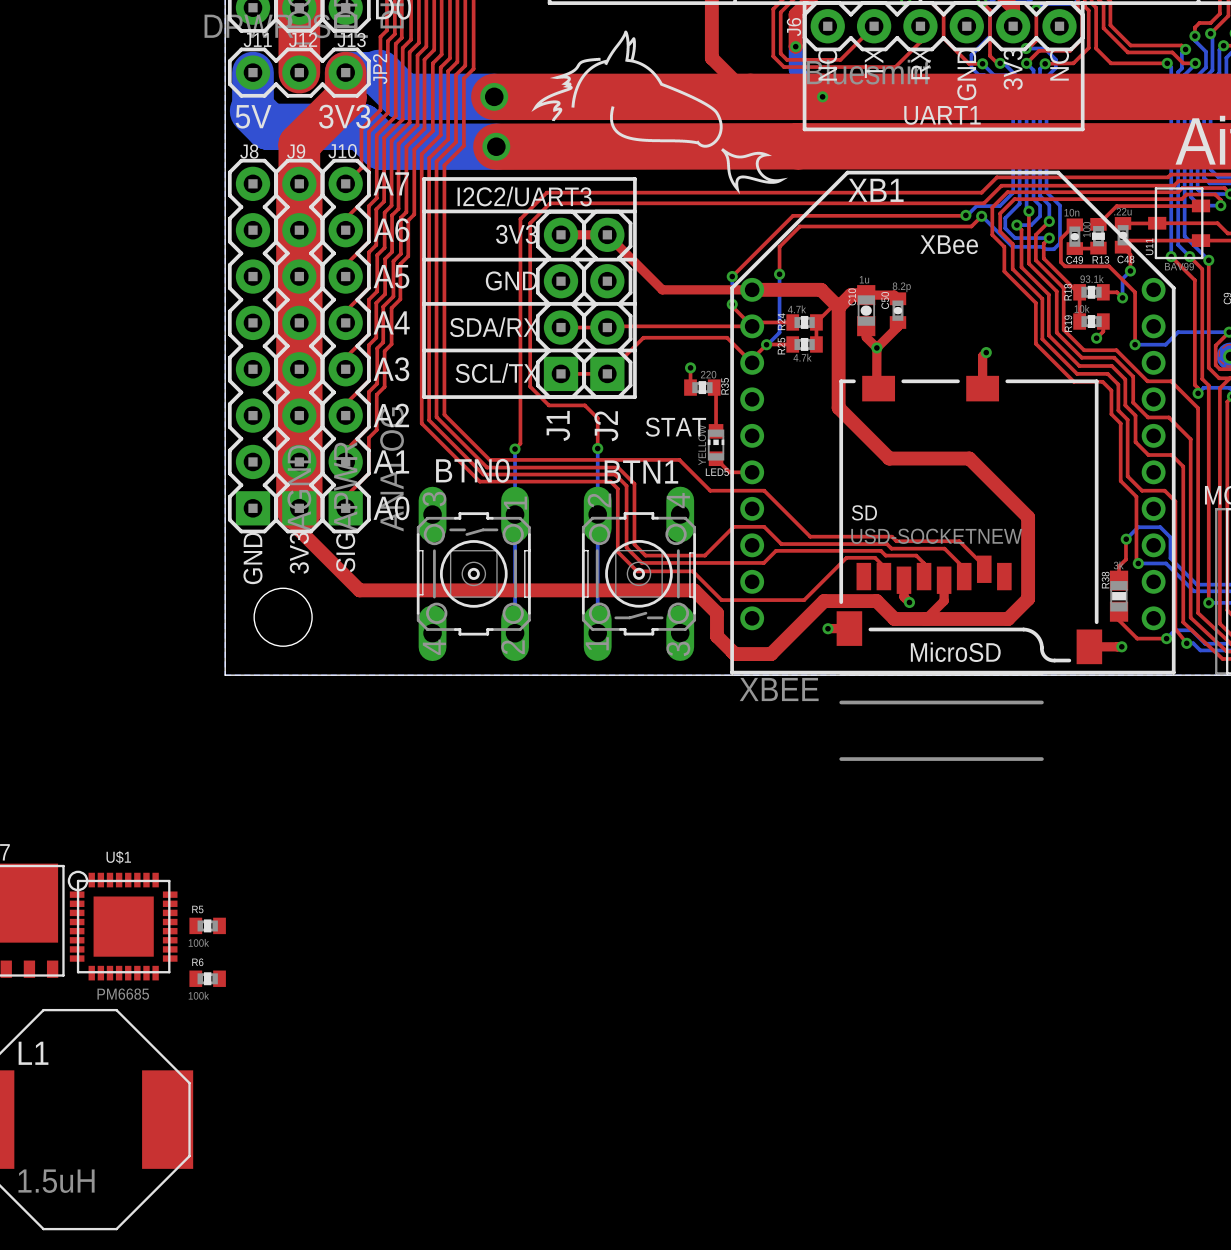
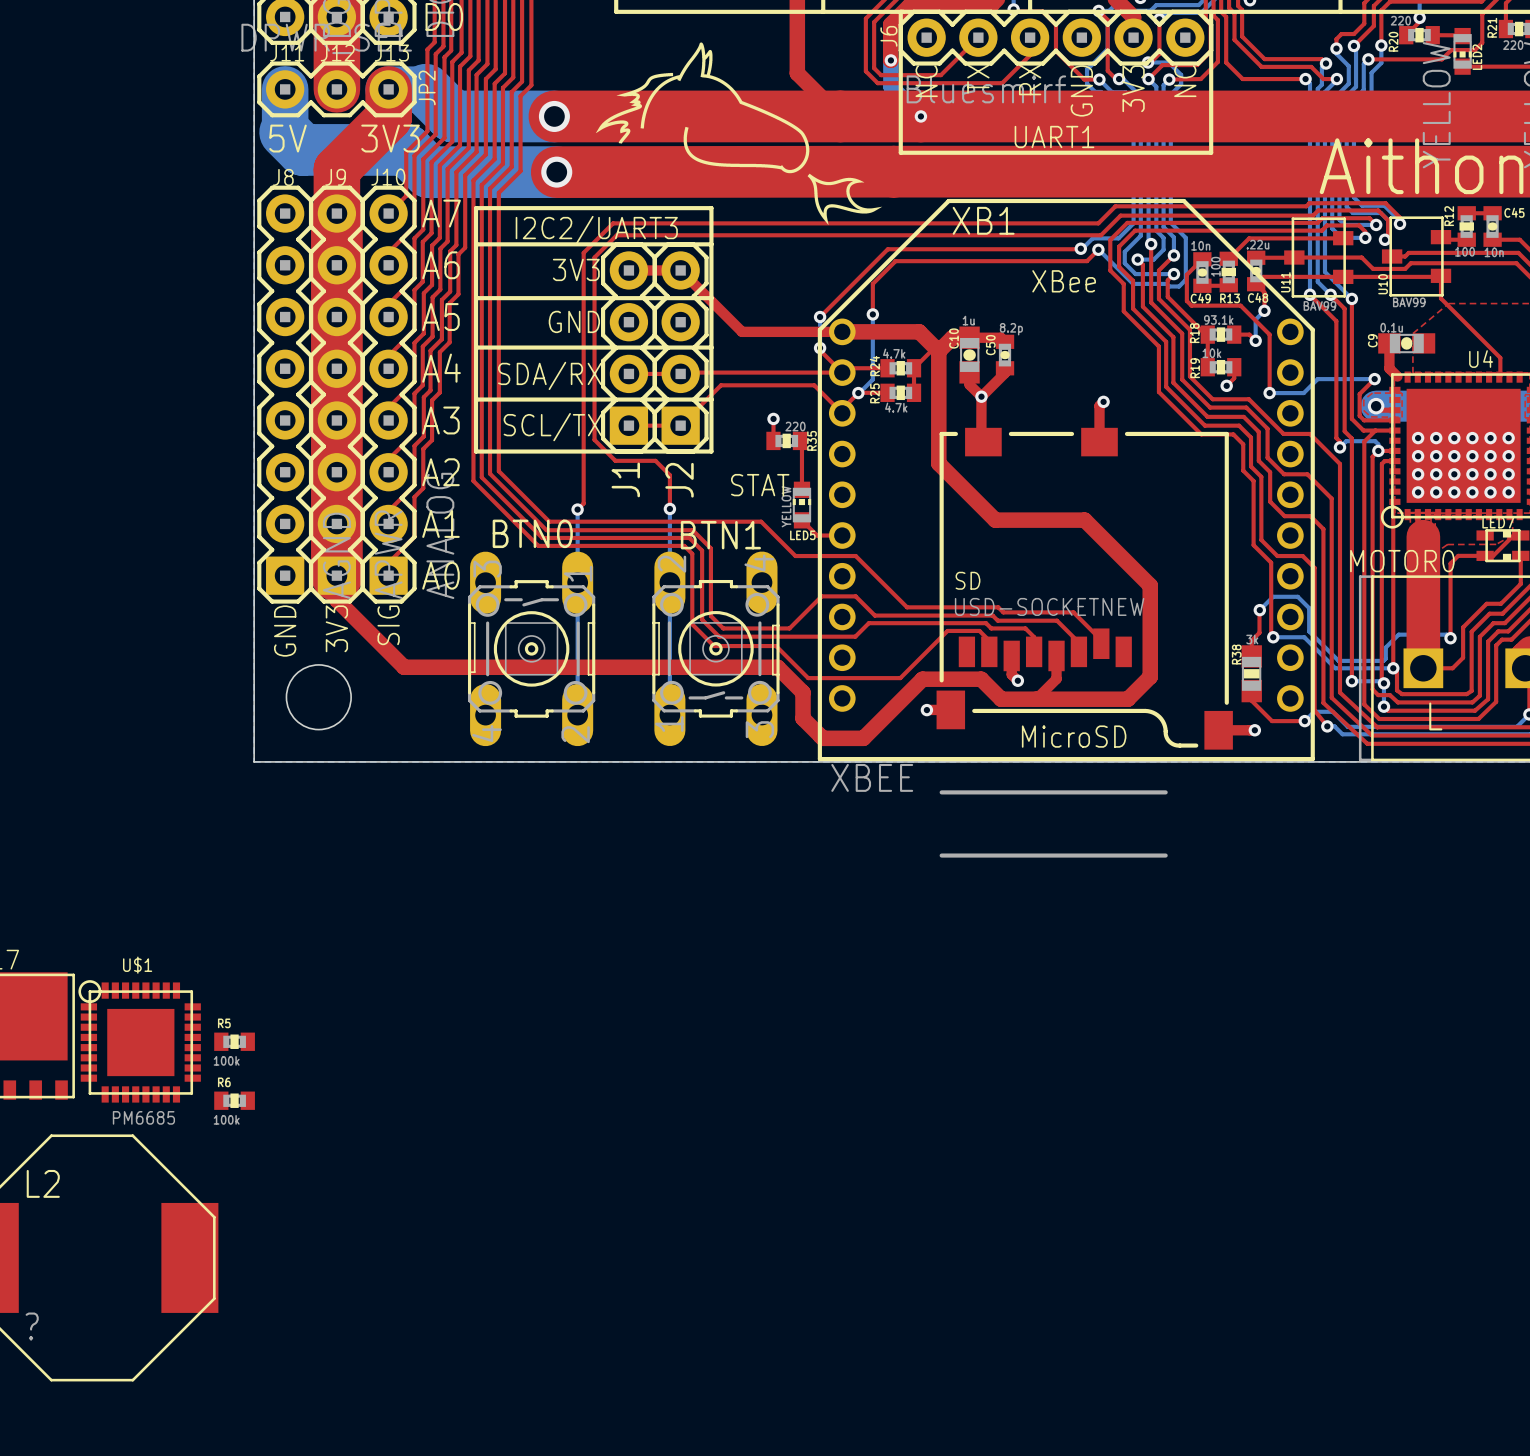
L1 name: L1 (33, 1053) -> L2 (43, 1183)
L1 value: 1.5uH (56, 1181) -> ? (32, 1326)

